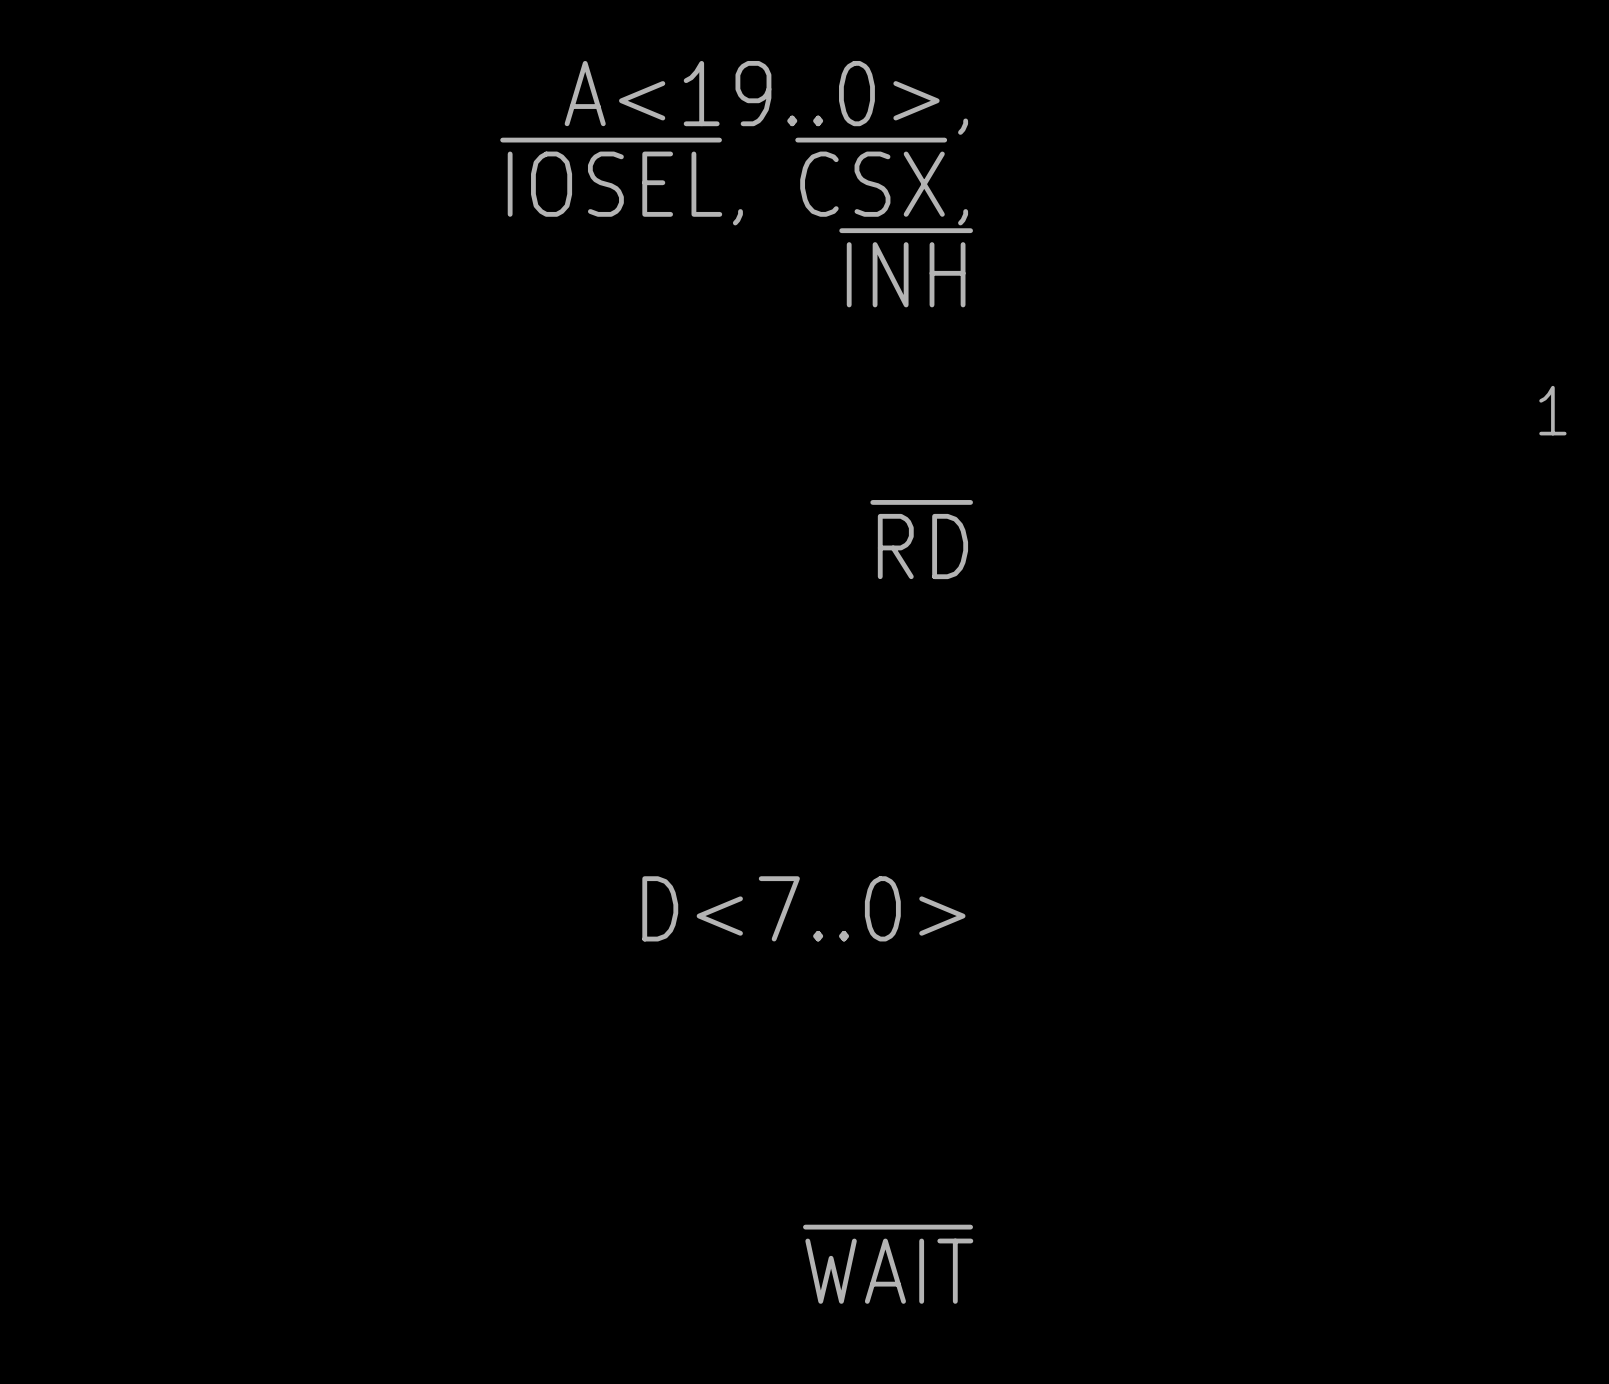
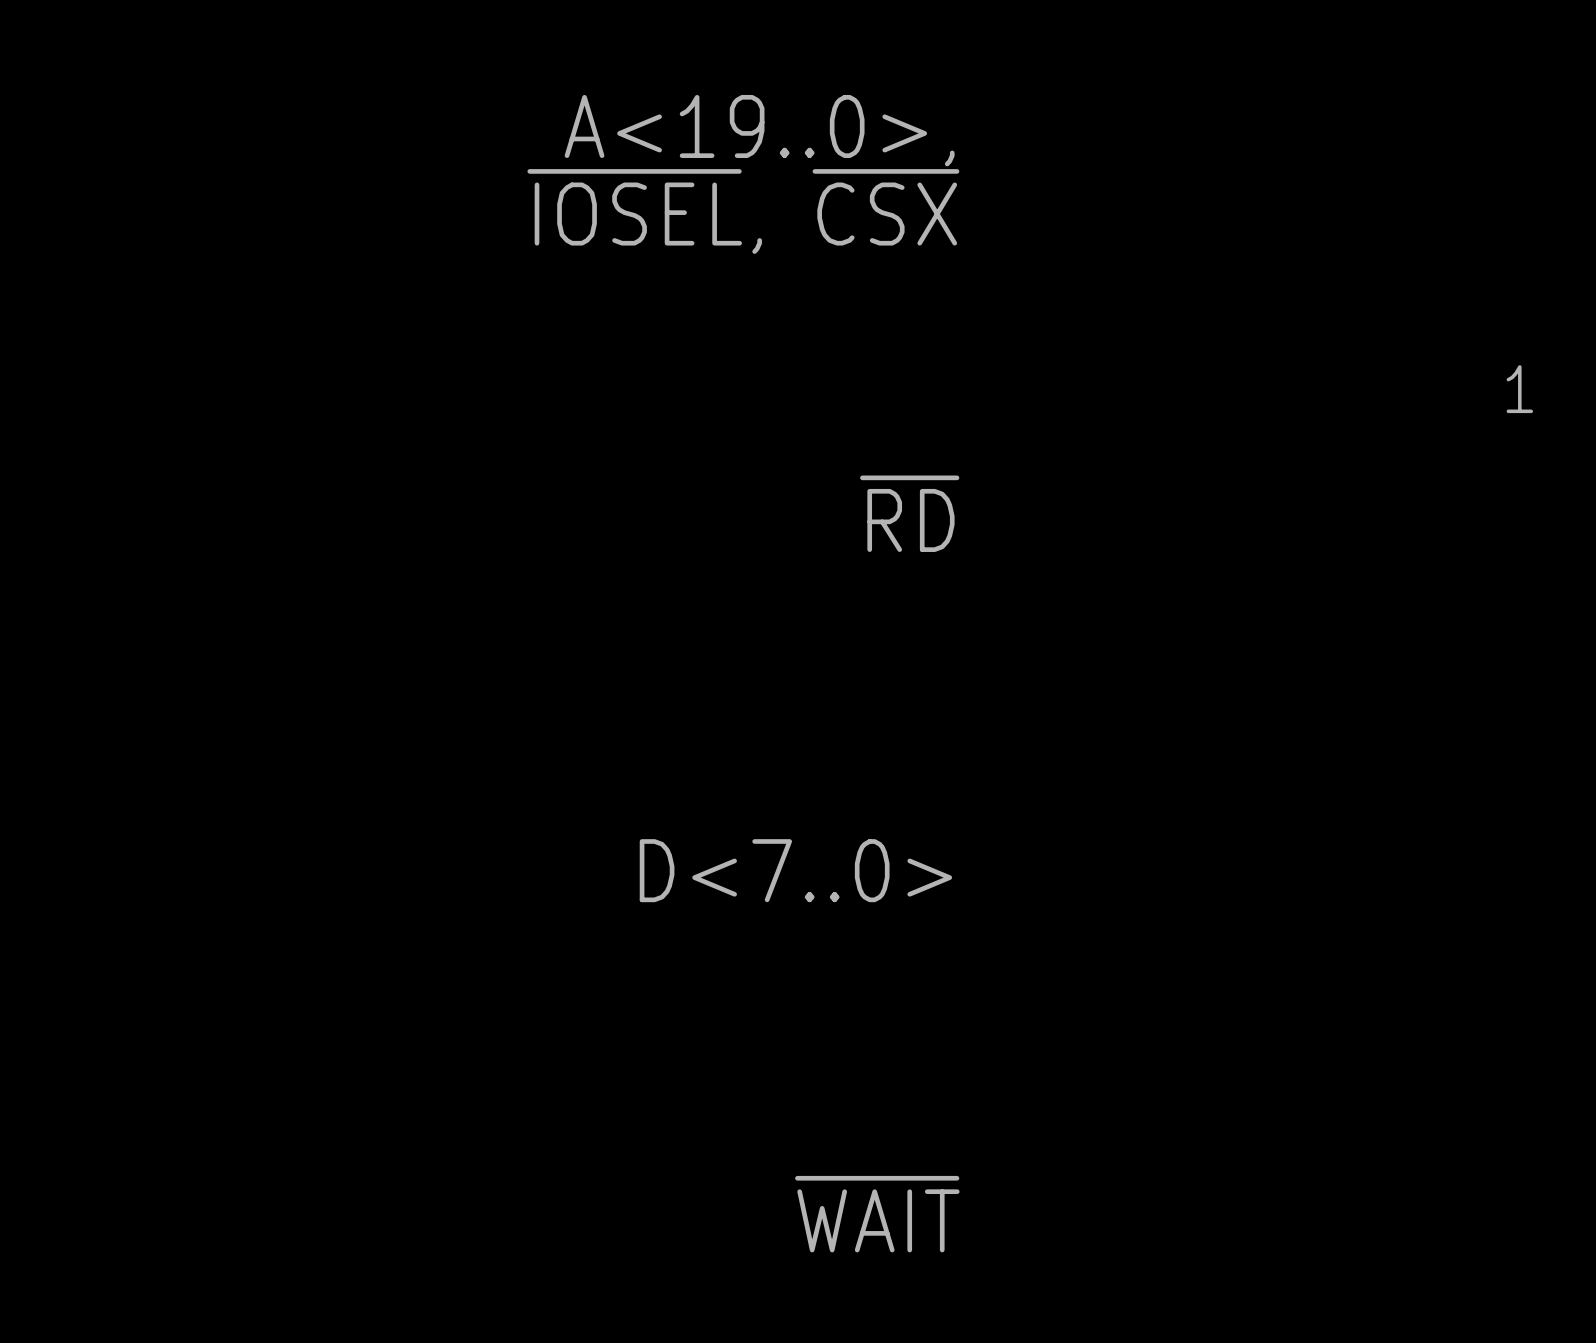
text position: A<19..0>, (766, 97) -> A<19..0>, (759, 130)
text: ~{IOSEL}, ~{CSX}, (734, 181) -> ~{IOSEL}, ~{CSX} (743, 211)
text: ~{INH} (906, 267) -> none

